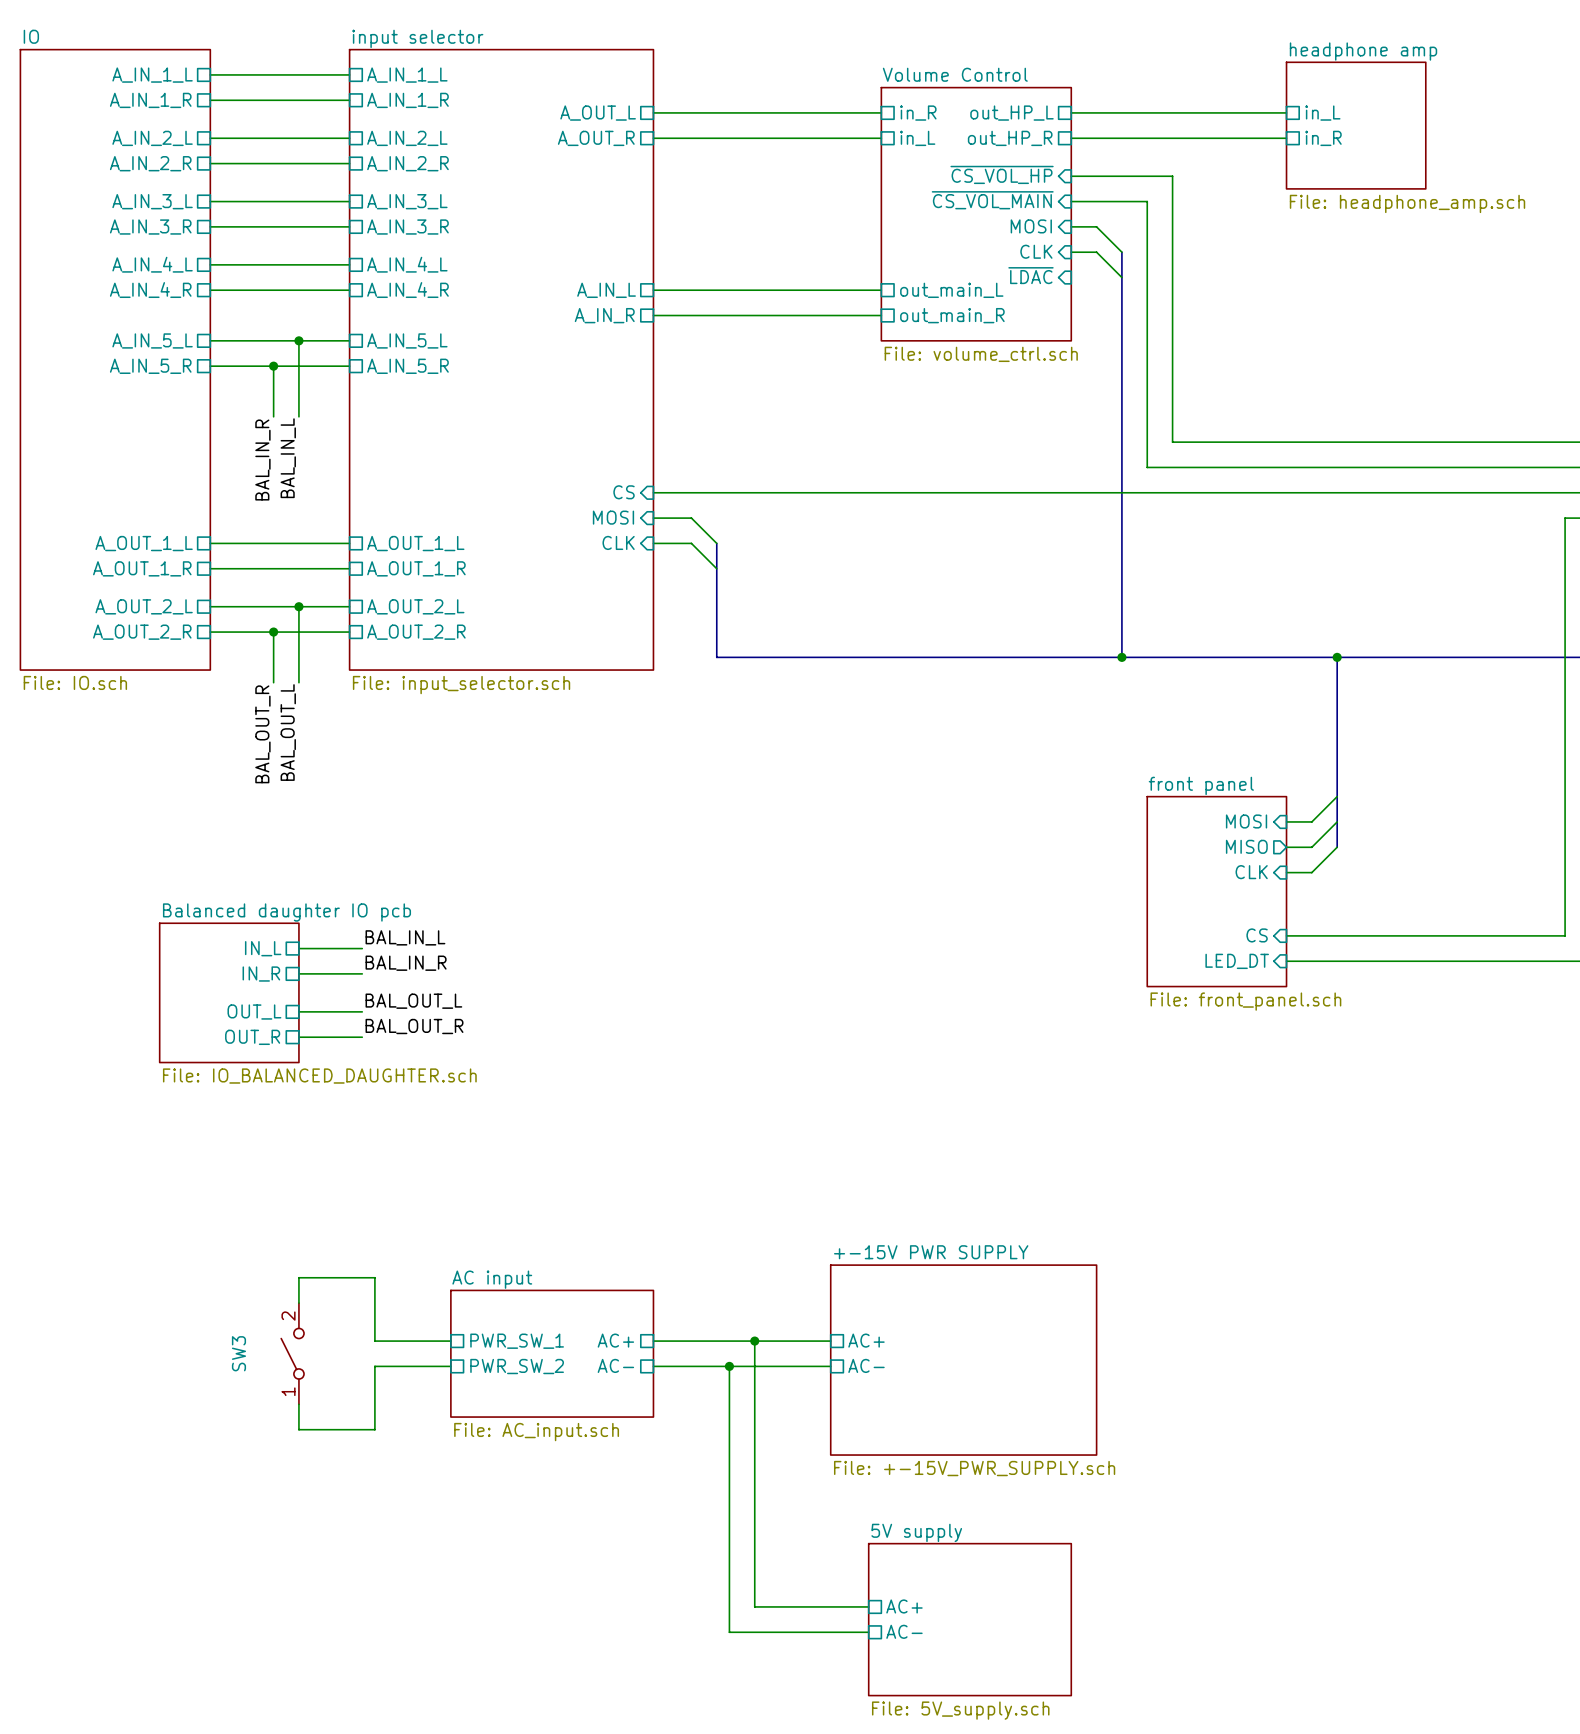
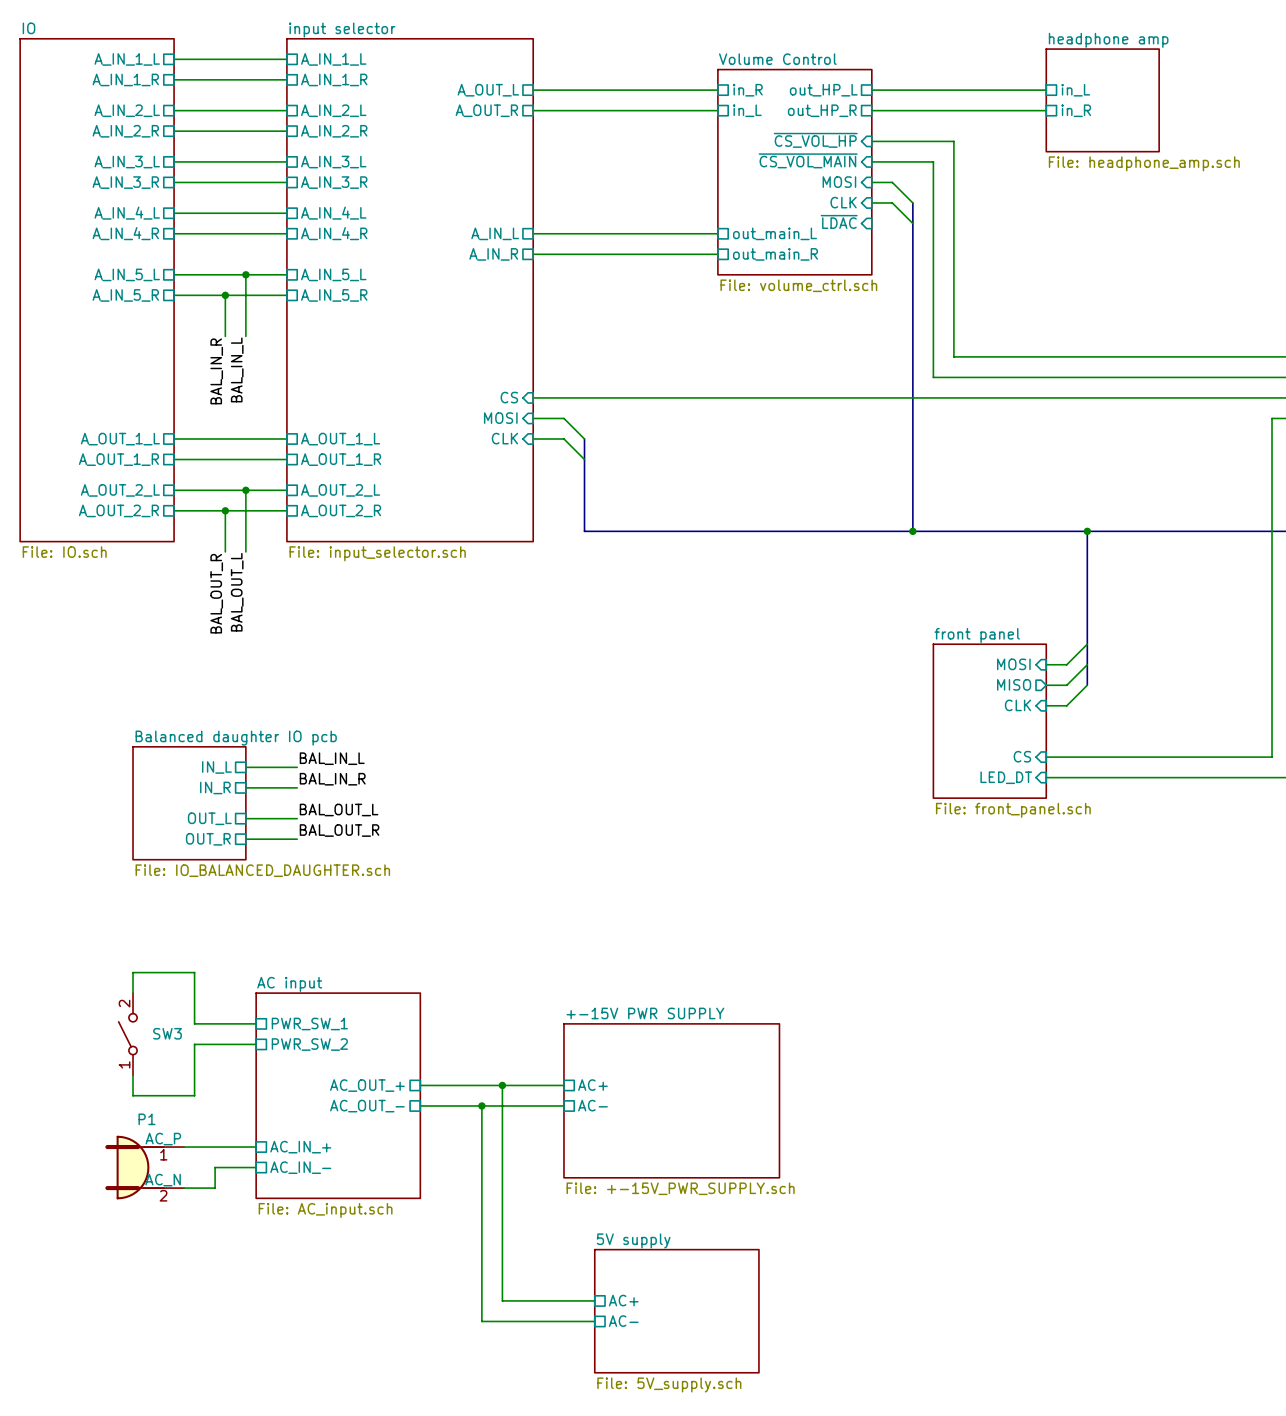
wire: (298, 1303) (298, 1277) (374, 1277) (374, 1341) (450, 1341) -> (133, 993) (133, 972) (194, 972) (194, 1023) (256, 1023)
sheet pin: AC+ (615, 1340) -> none
sheet pin: none -> AC+ (592, 1085)
sheet pin: AC+ (866, 1340) -> none
sheet pin: none -> AC_OUT_+ (367, 1085)
sheet pin position: PWR_SW_1 (517, 1341) -> PWR_SW_1 (309, 1023)
junction: none -> (502, 1085)
wire: (691, 1341) (830, 1341) -> (420, 1085) (533, 1085)
wire: (754, 1341) (754, 1606) (868, 1606) -> (502, 1085) (502, 1300) (594, 1300)
junction: (754, 1341) -> none
SW3 name rotation: 0° (238, 1353) -> 90° clockwise (167, 1033)
SW3 name position: SW3 (238, 1353) -> SW3 (167, 1033)
SW3 position: (292, 1353) -> (127, 1034)
sheet AC input: none -> File: AC_input.sch (338, 1095)
sheet AC input: File: AC_input.sch (552, 1353) -> none
sheet +-15V PWR SUPPLY position: (963, 1360) -> (671, 1100)
sheet pin: AC- (615, 1365) -> none
sheet pin: none -> AC- (592, 1105)
sheet pin: AC- (866, 1365) -> none
sheet pin: none -> AC_OUT_- (367, 1106)
wire: (450, 1366) (374, 1366) (374, 1429) (298, 1429) (298, 1404) -> (256, 1044) (194, 1044) (194, 1095) (133, 1095) (133, 1075)
sheet pin position: PWR_SW_2 (517, 1366) -> PWR_SW_2 (309, 1044)
junction: none -> (481, 1105)
wire: (691, 1366) (830, 1366) -> (420, 1105) (533, 1105)
wire: (729, 1366) (729, 1632) (868, 1632) -> (481, 1105) (481, 1321) (594, 1321)
junction: (729, 1366) -> none
wire: none -> (184, 1147) (256, 1147)
sheet pin: none -> AC_IN_+ (300, 1147)
P1: none -> (144, 1167)
wire: none -> (256, 1167) (215, 1167) (215, 1188) (184, 1188)
sheet pin: none -> AC_IN_- (300, 1167)
sheet pin position: AC+ (904, 1606) -> AC+ (623, 1300)
sheet 5V supply position: (969, 1619) -> (676, 1311)
sheet pin position: AC- (904, 1631) -> AC- (623, 1321)

